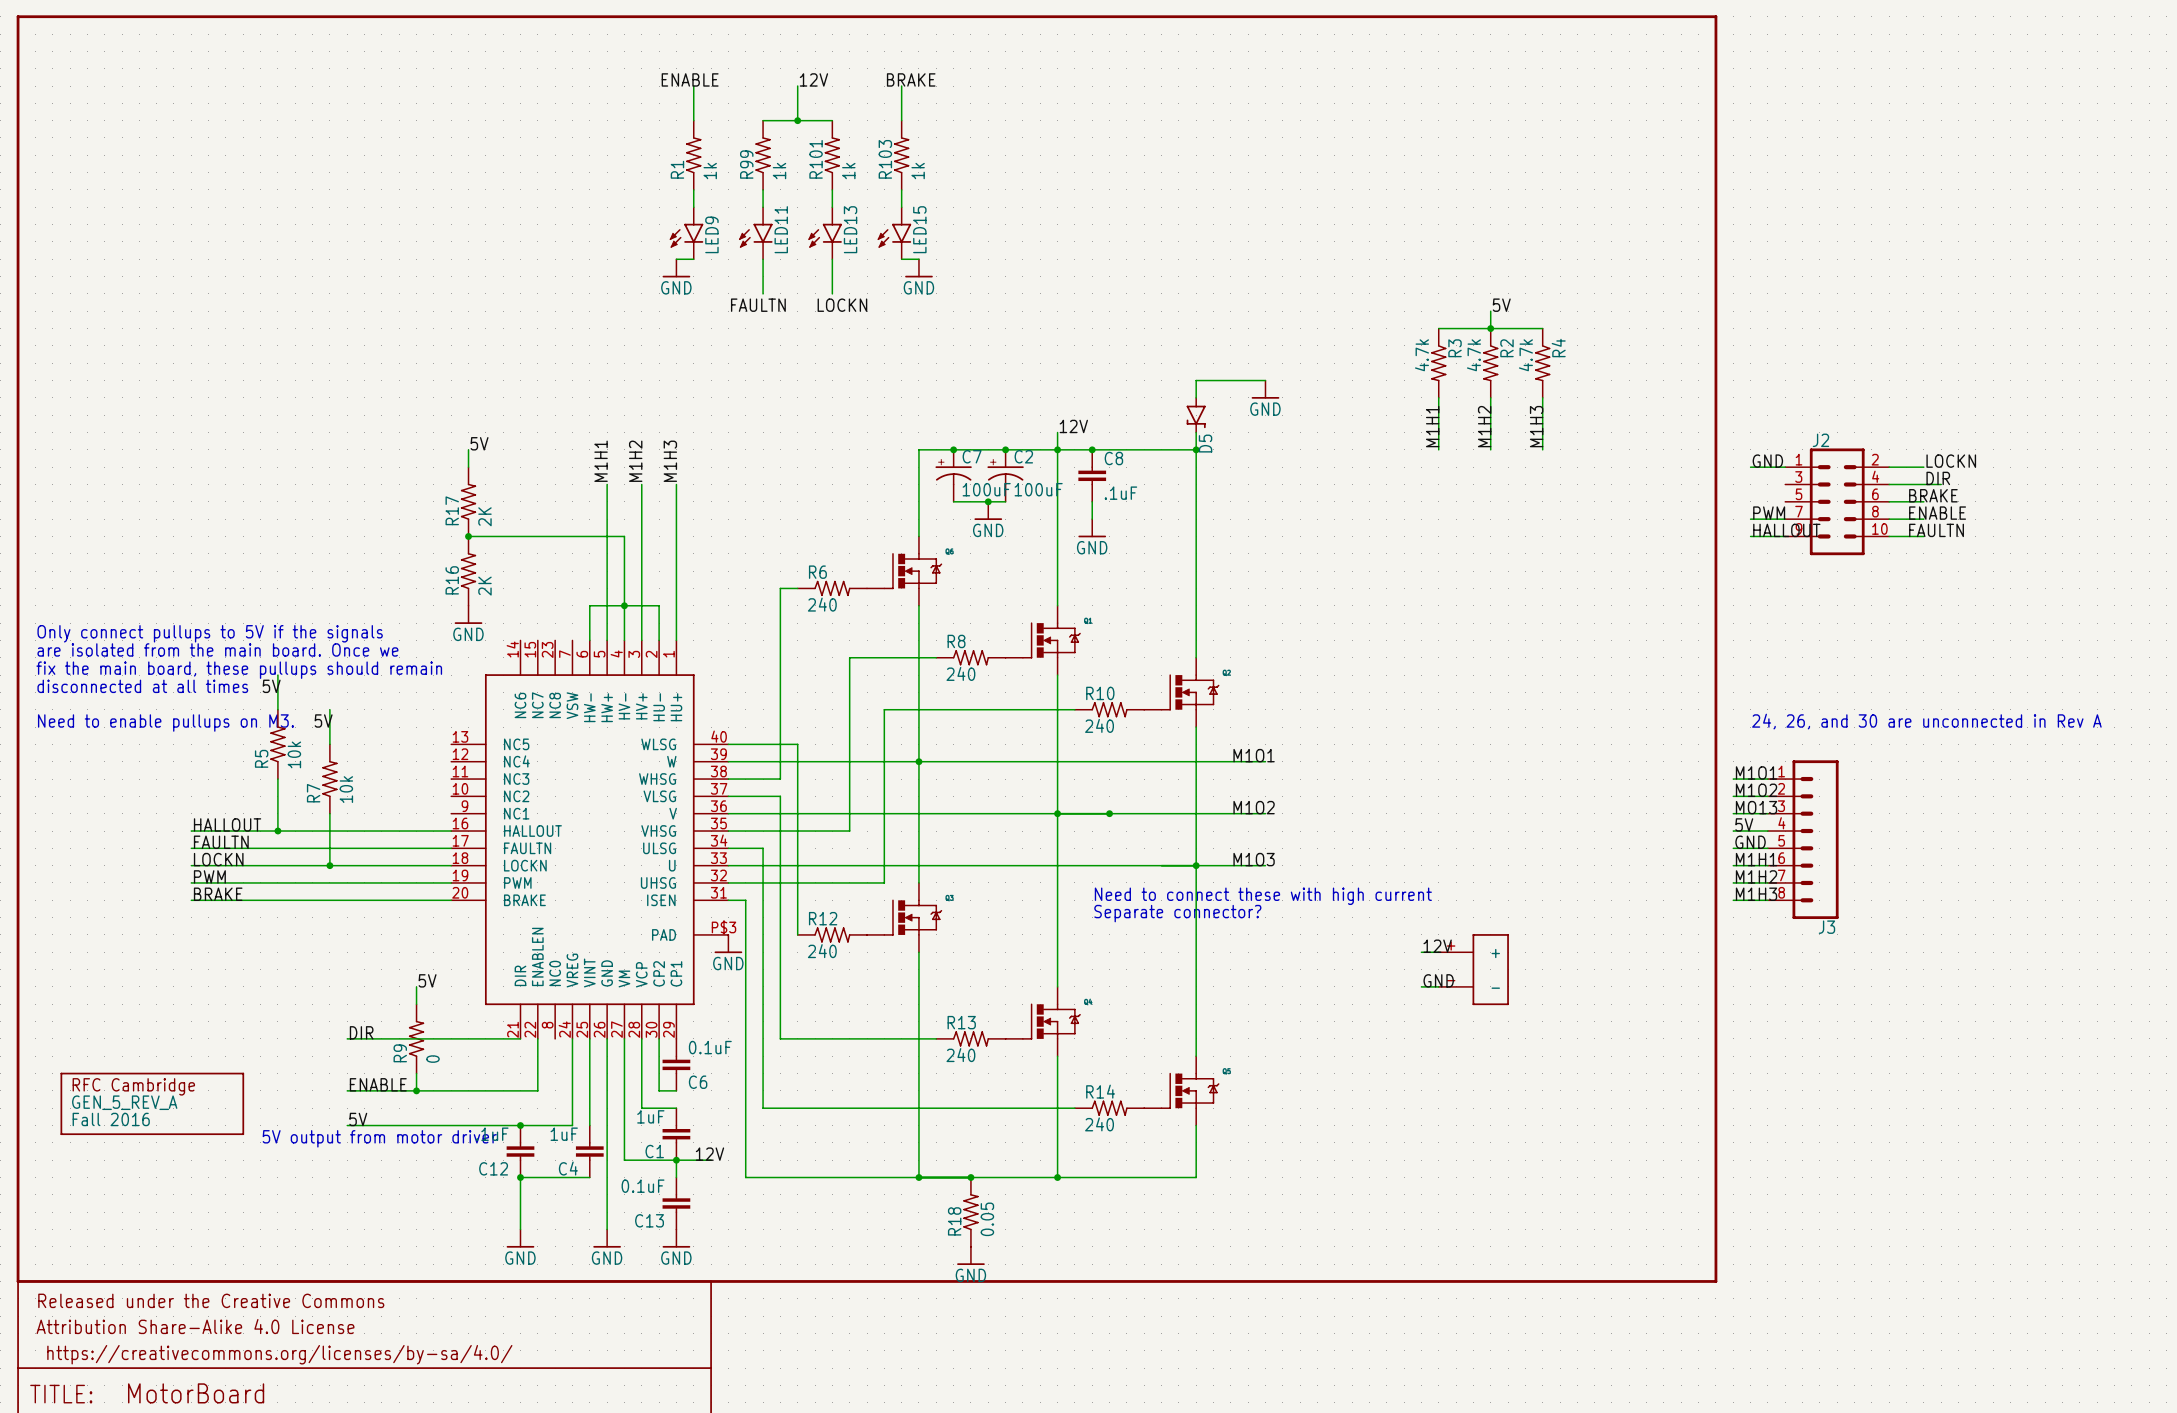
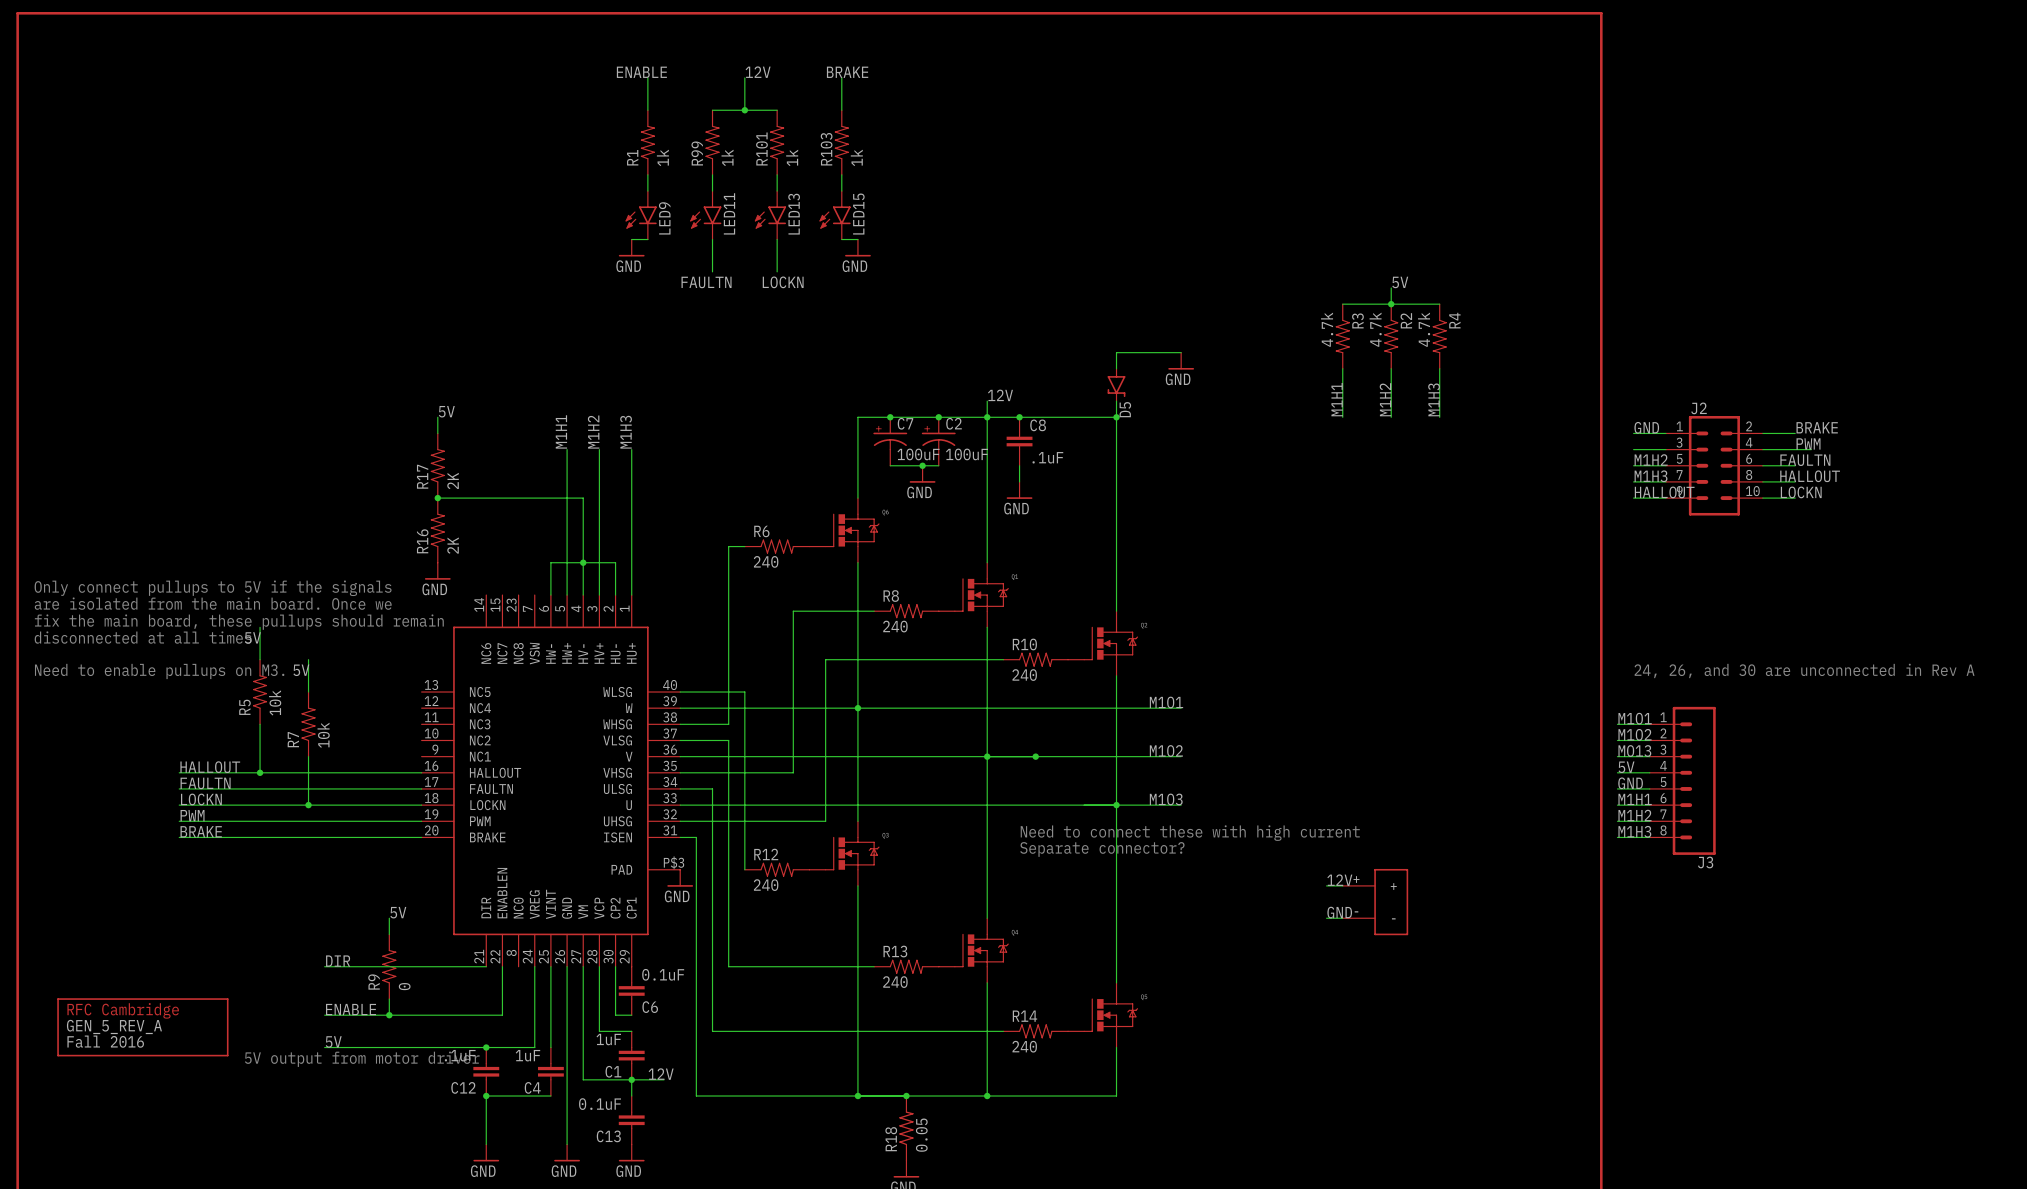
label: LOCKN (1951, 461) -> BRAKE (1817, 427)
label: DIR (1938, 478) -> PWM (1808, 443)
wire: none -> (1633, 449) (1665, 449)
label: none -> M1H2 (1651, 460)
label: BRAKE (1933, 495) -> FAULTN (1805, 460)
wire: none -> (1633, 465) (1665, 465)
label: PWM (1769, 513) -> M1H3 (1651, 476)
label: ENABLE (1937, 513) -> HALLOUT (1810, 476)
label: FAULTN (1936, 530) -> LOCKN (1801, 492)

